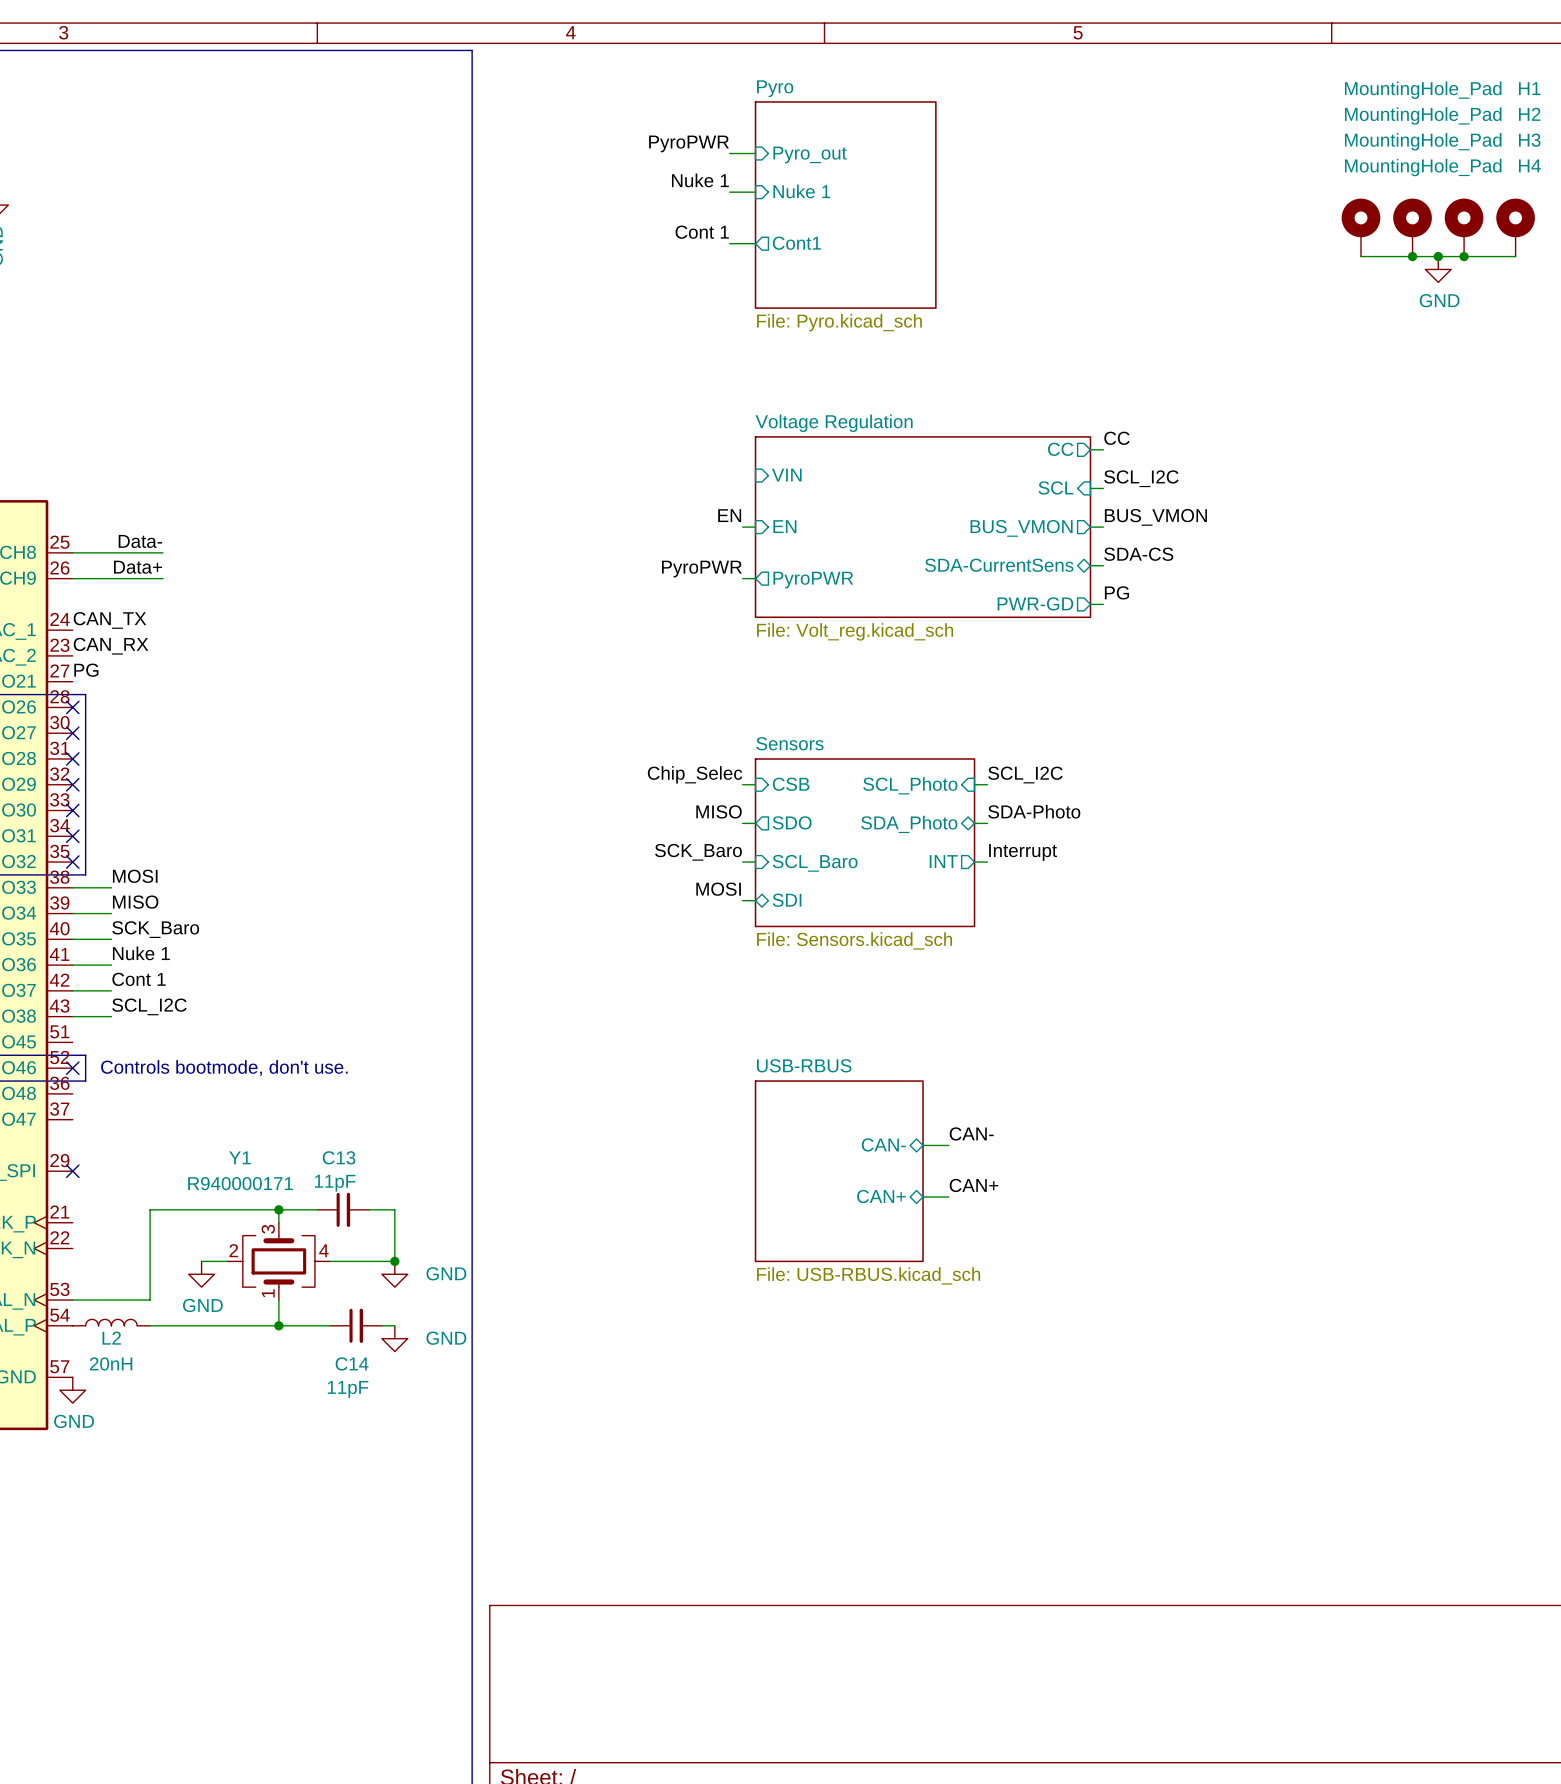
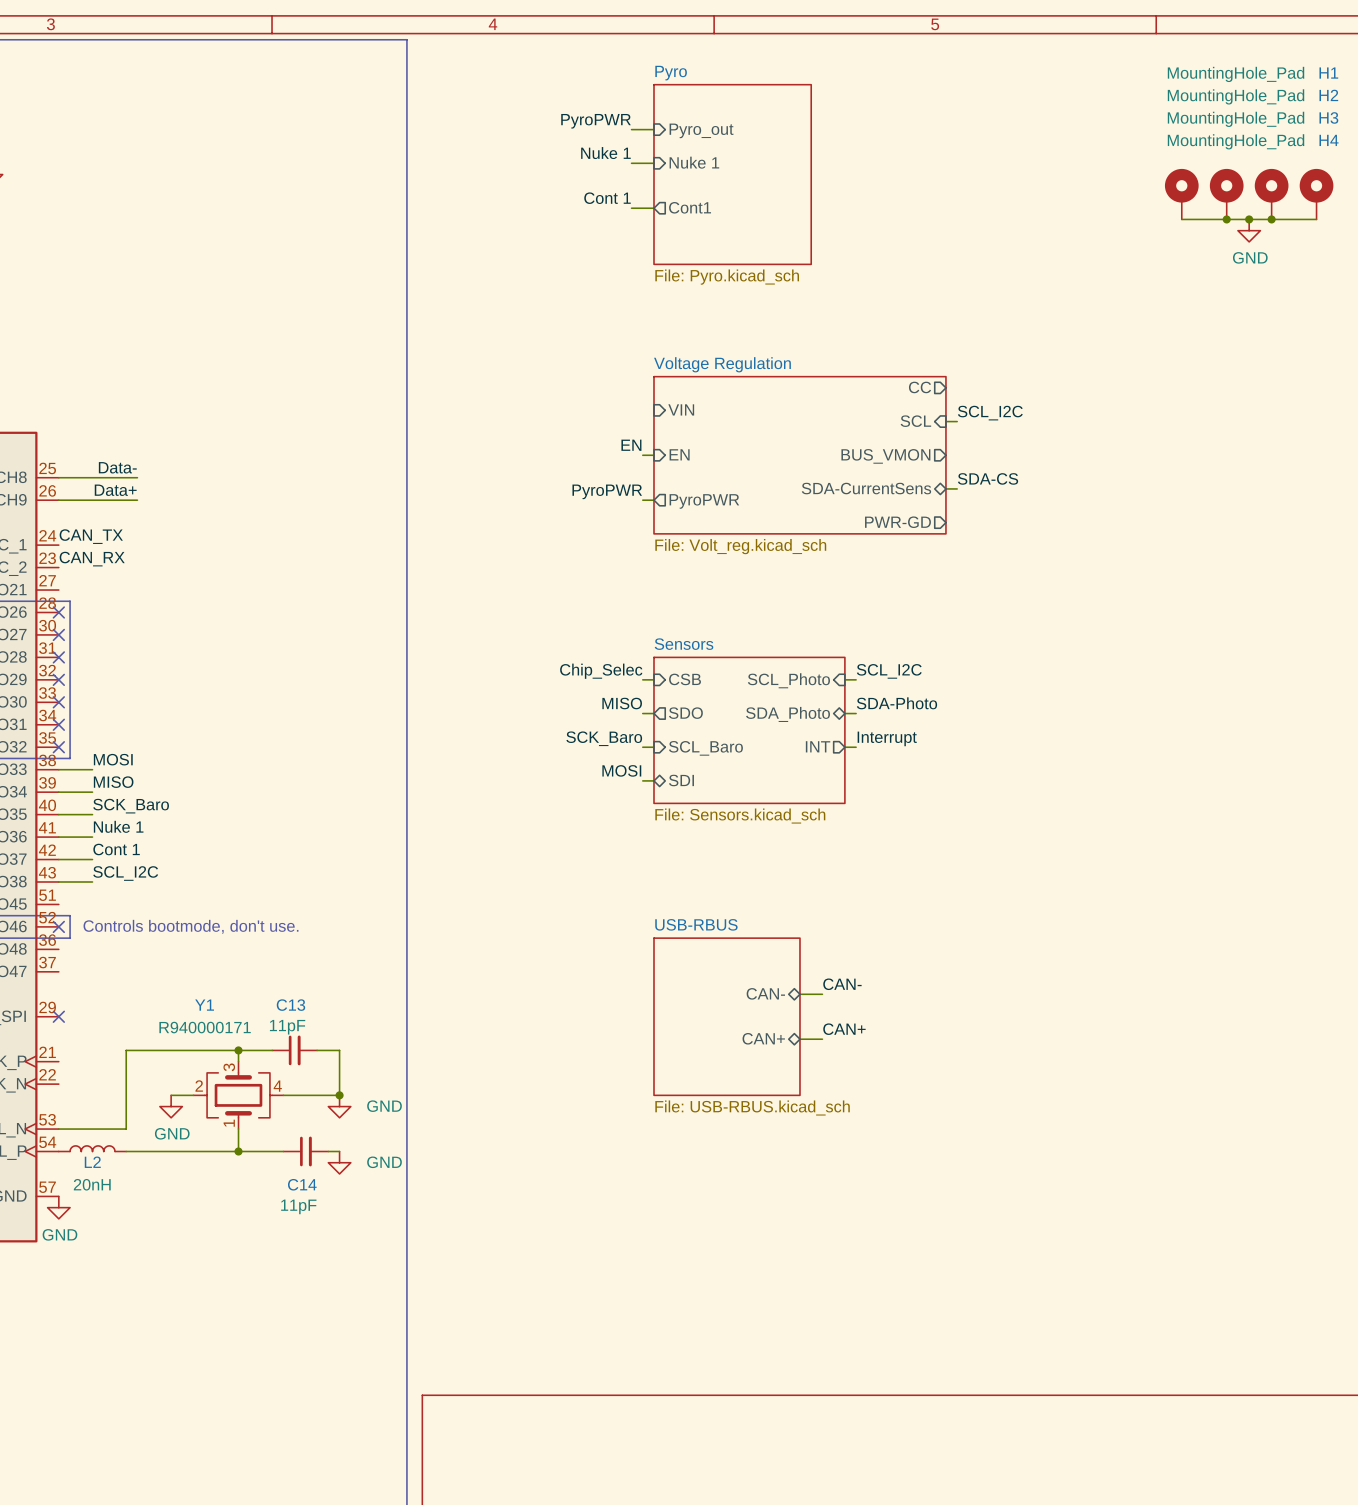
label: CC (1116, 438) -> none
wire: (1090, 449) (1103, 449) -> none
label: BUS_VMON (1155, 517) -> none
wire: (1090, 527) (1103, 527) -> none
label: PG (1116, 592) -> none
wire: (1090, 604) (1103, 604) -> none
label: PG (86, 670) -> none

